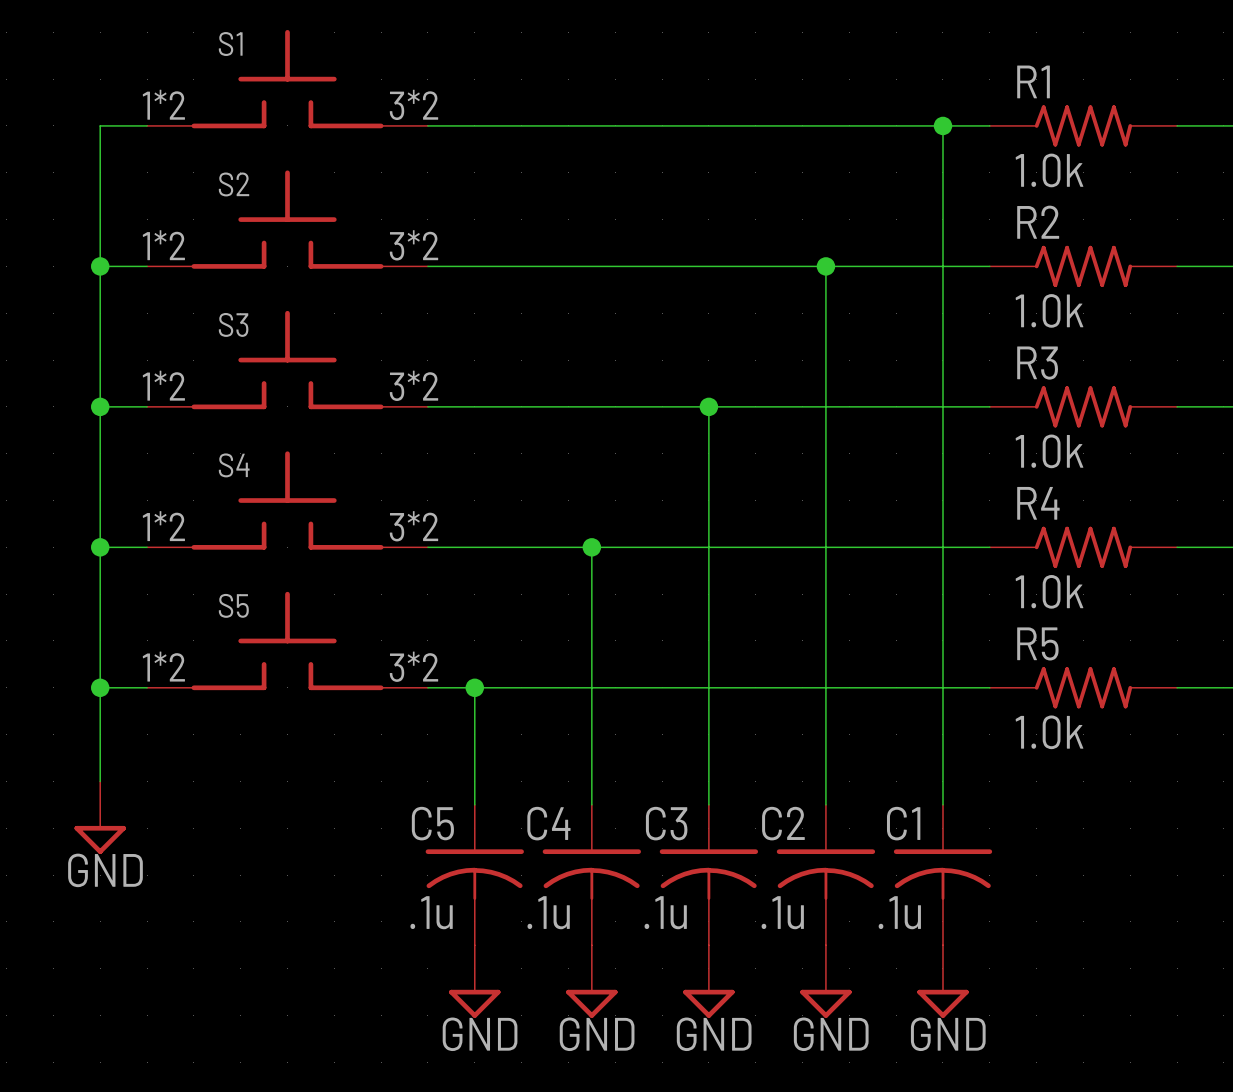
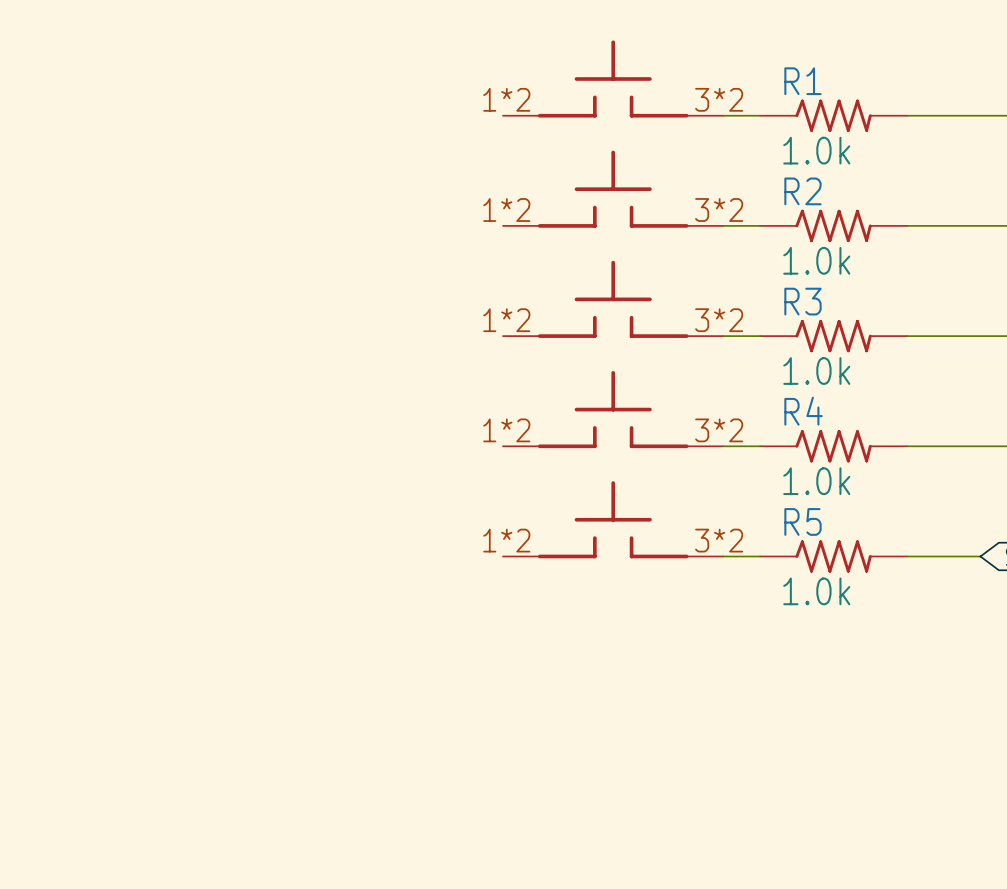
S1: (287, 79) -> none
part: none -> (613, 79)
wire: (147, 125) (100, 125) (100, 781) -> none
wire: (427, 125) (942, 125) (942, 804) -> none
junction: (942, 125) -> none
S2: (287, 219) -> none
part: none -> (613, 189)
wire: (100, 266) (147, 266) -> none
junction: (100, 266) -> none
wire: (427, 266) (942, 266) -> none
wire: (825, 266) (825, 804) -> none
junction: (825, 266) -> none
S3: (287, 360) -> none
part: none -> (613, 299)
wire: (100, 406) (147, 406) -> none
junction: (100, 406) -> none
wire: (427, 406) (942, 406) -> none
wire: (708, 406) (708, 804) -> none
junction: (708, 406) -> none
S4: (287, 500) -> none
part: none -> (613, 409)
wire: (100, 547) (147, 547) -> none
junction: (100, 547) -> none
wire: (427, 547) (942, 547) -> none
wire: (591, 547) (591, 804) -> none
junction: (591, 547) -> none
S5: (287, 640) -> none
part: none -> (613, 519)
wire: (100, 687) (147, 687) -> none
junction: (100, 687) -> none
wire: (427, 687) (942, 687) -> none
wire: (474, 687) (474, 804) -> none
junction: (474, 687) -> none
power symbol: GND (100, 817) -> none
C5: .1u (474, 875) -> none
C4: .1u (591, 875) -> none
C3: .1u (708, 875) -> none
C2: .1u (825, 875) -> none
C1: .1u (942, 875) -> none
power symbol: GND (474, 981) -> none
power symbol: GND (591, 981) -> none
power symbol: GND (708, 981) -> none
power symbol: GND (825, 981) -> none
power symbol: GND (942, 981) -> none

